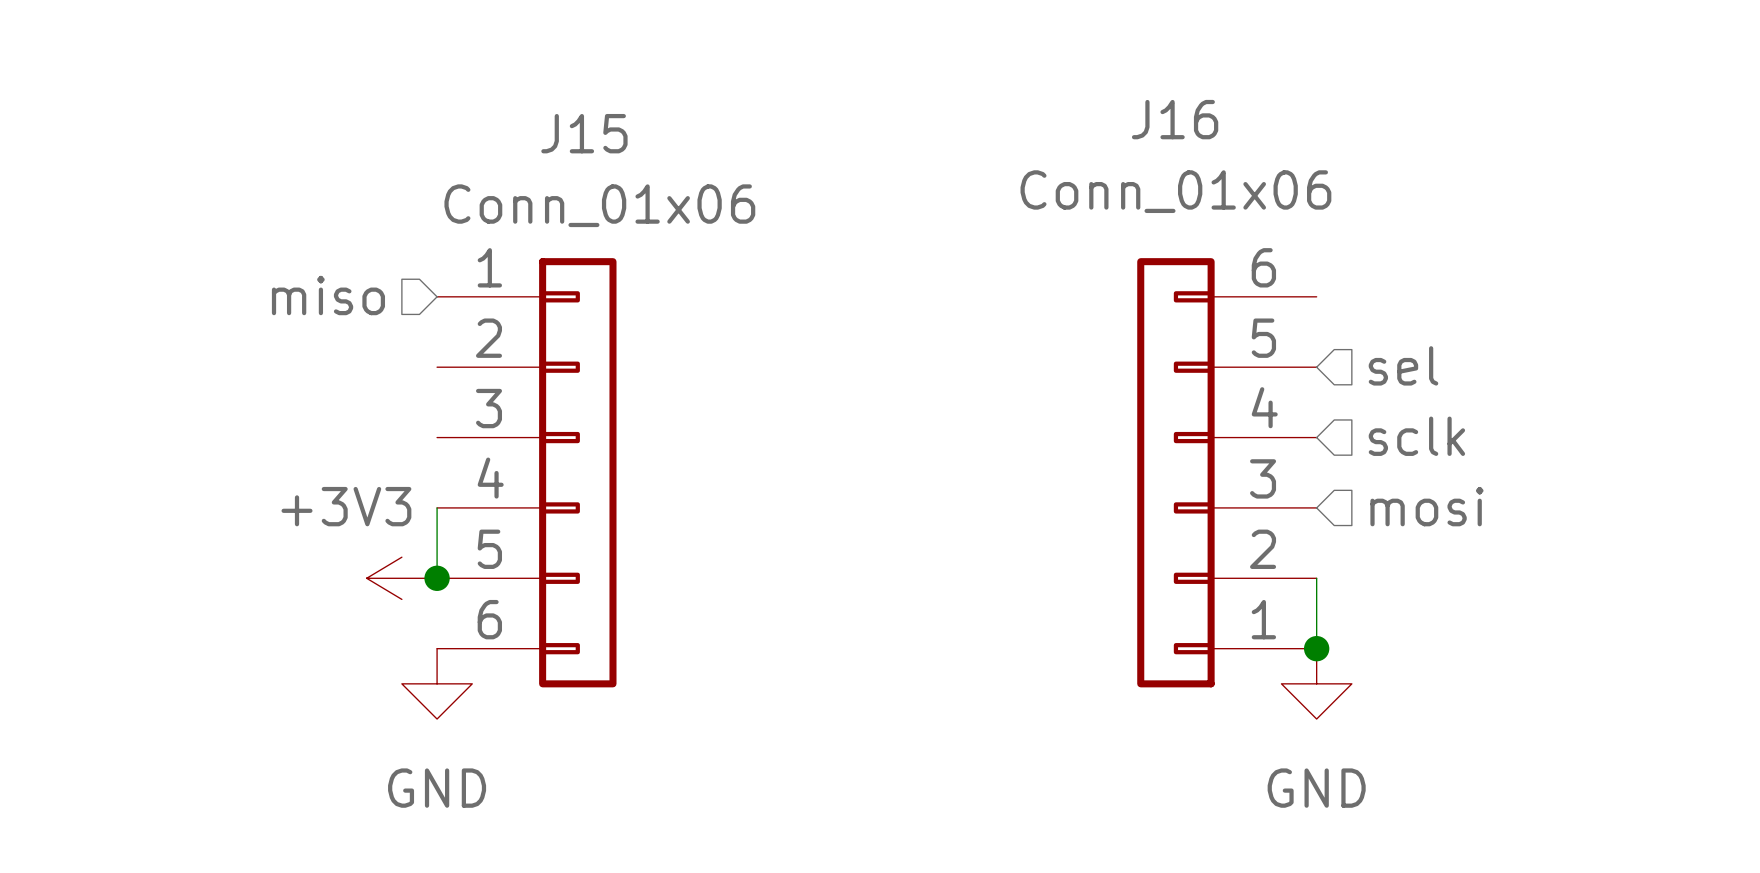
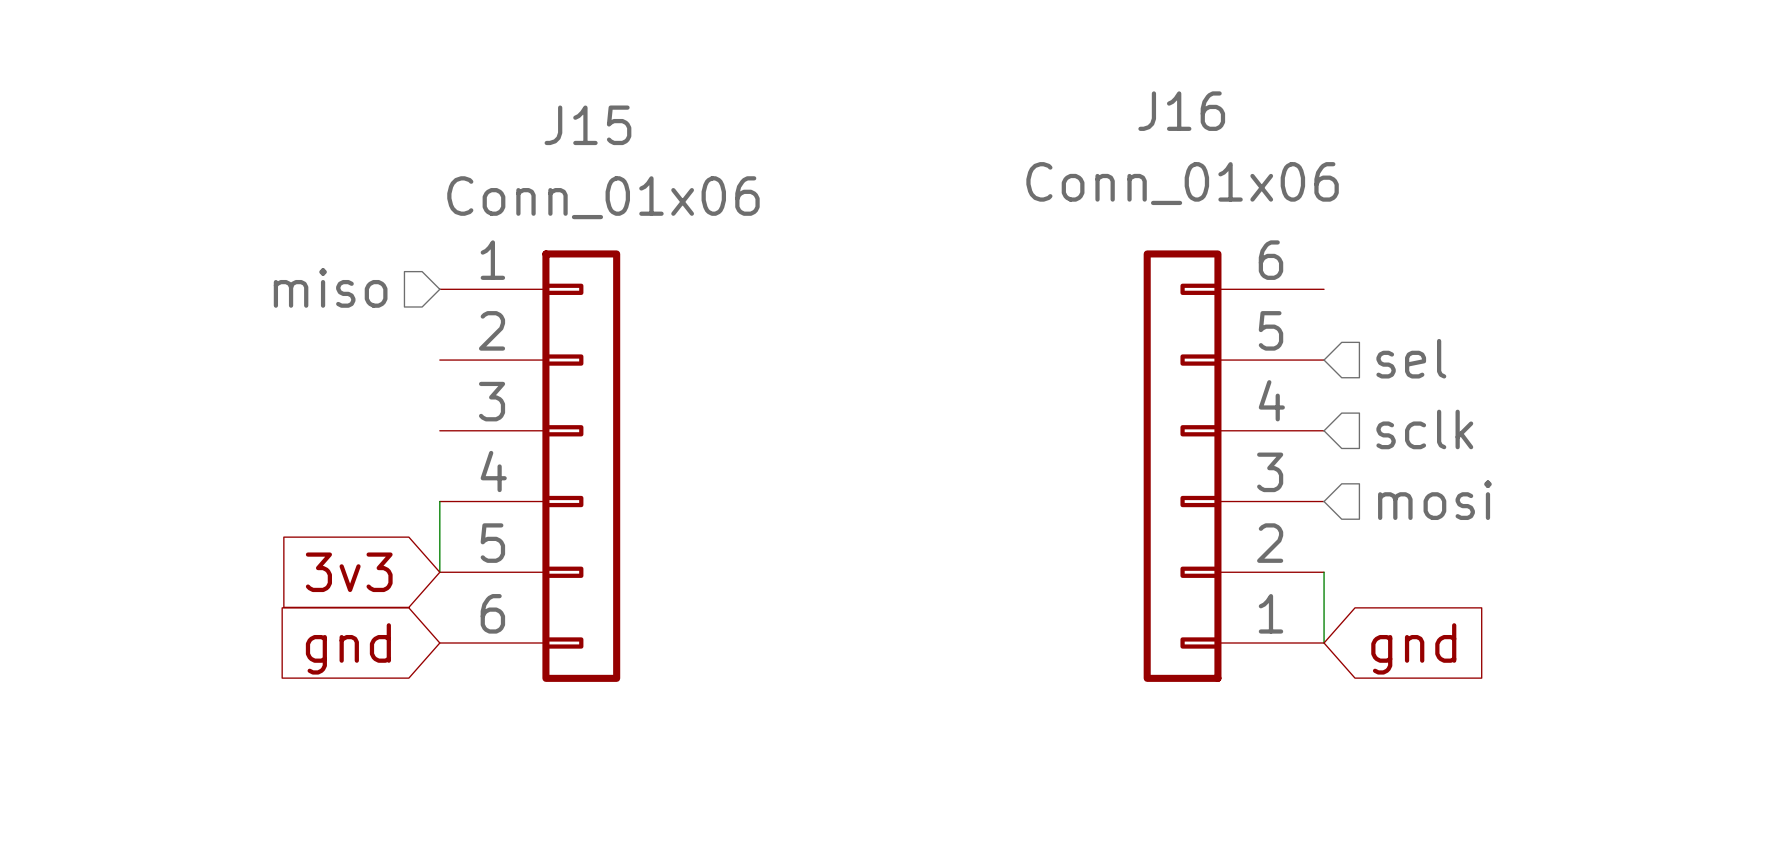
global label: none -> 3v3 (349, 572)
power symbol: +3V3 (401, 578) -> none
junction: (437, 578) -> none
junction: (1316, 648) -> none
global label: none -> gnd (348, 648)
global label: none -> gnd (1413, 648)
power symbol: GND (437, 683) -> none
power symbol: GND (1316, 683) -> none

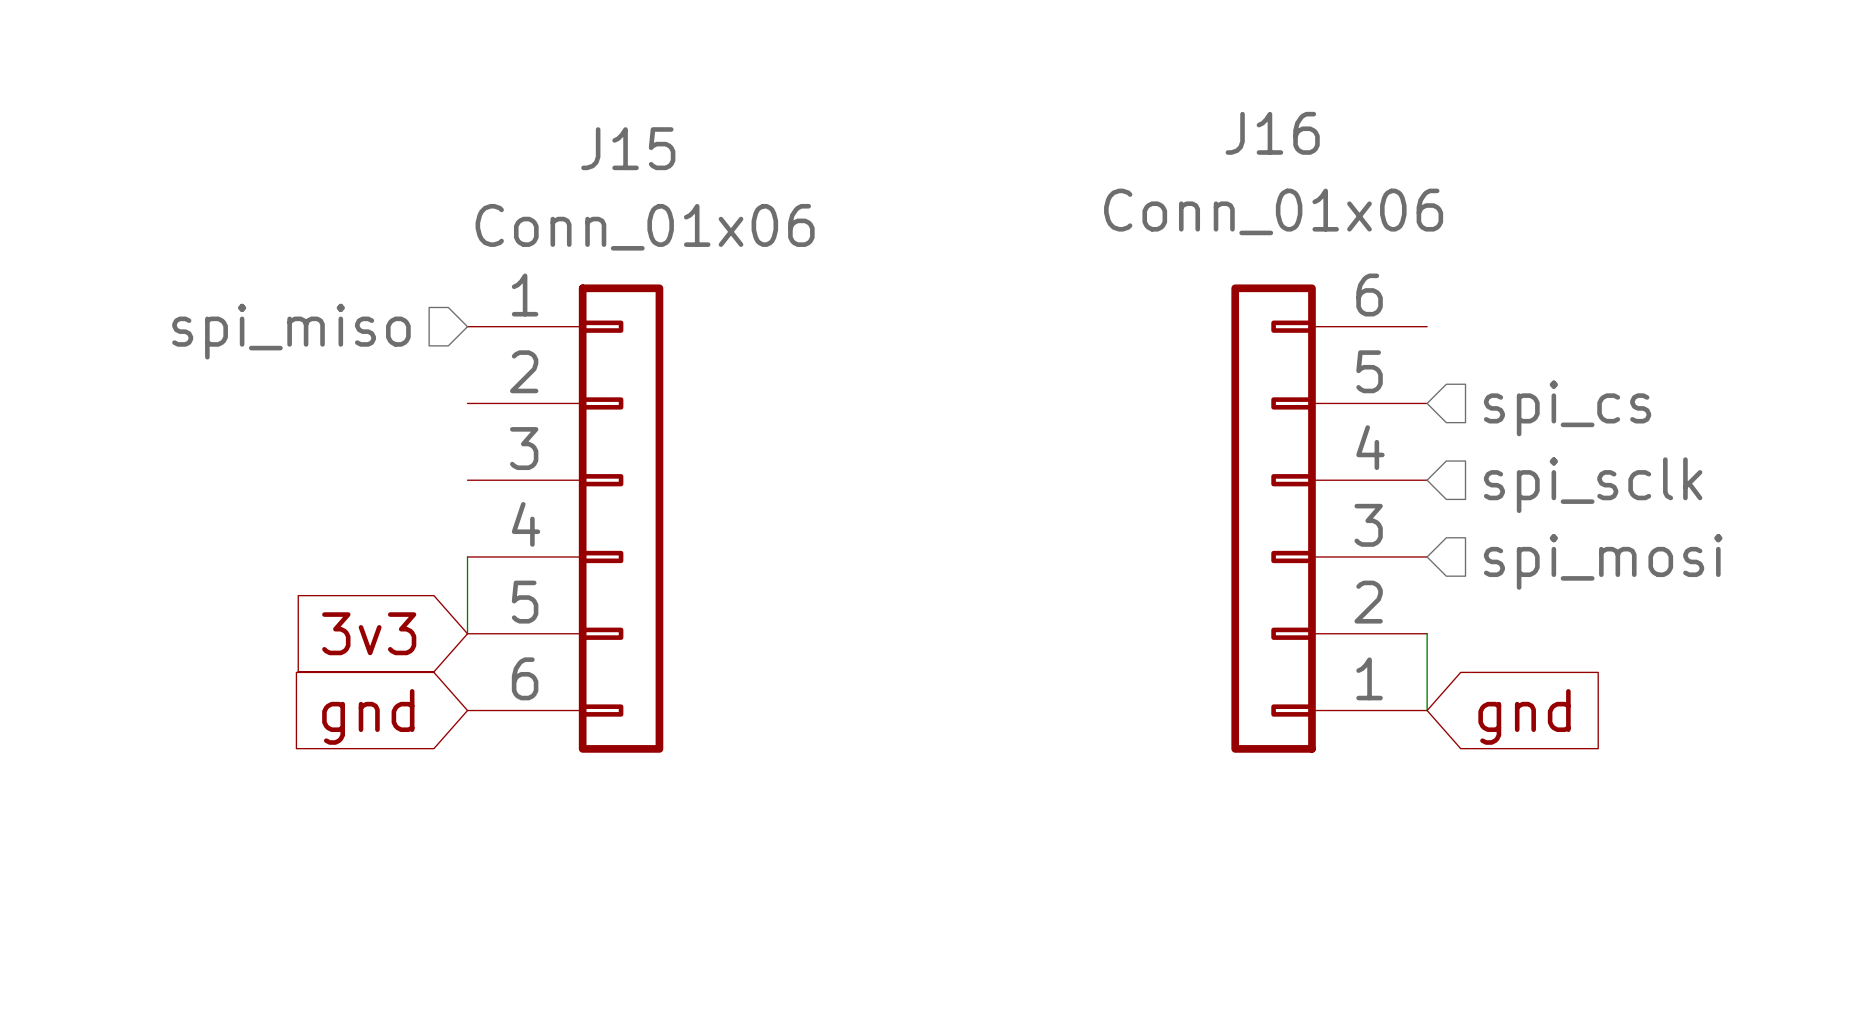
hierarchical label: miso (330, 287) -> spi_miso (291, 331)
hierarchical label: sel (1411, 358) -> spi_cs (1567, 408)
hierarchical label: sclk (1424, 429) -> spi_sclk (1593, 485)
hierarchical label: mosi (1434, 500) -> spi_mosi (1603, 561)

